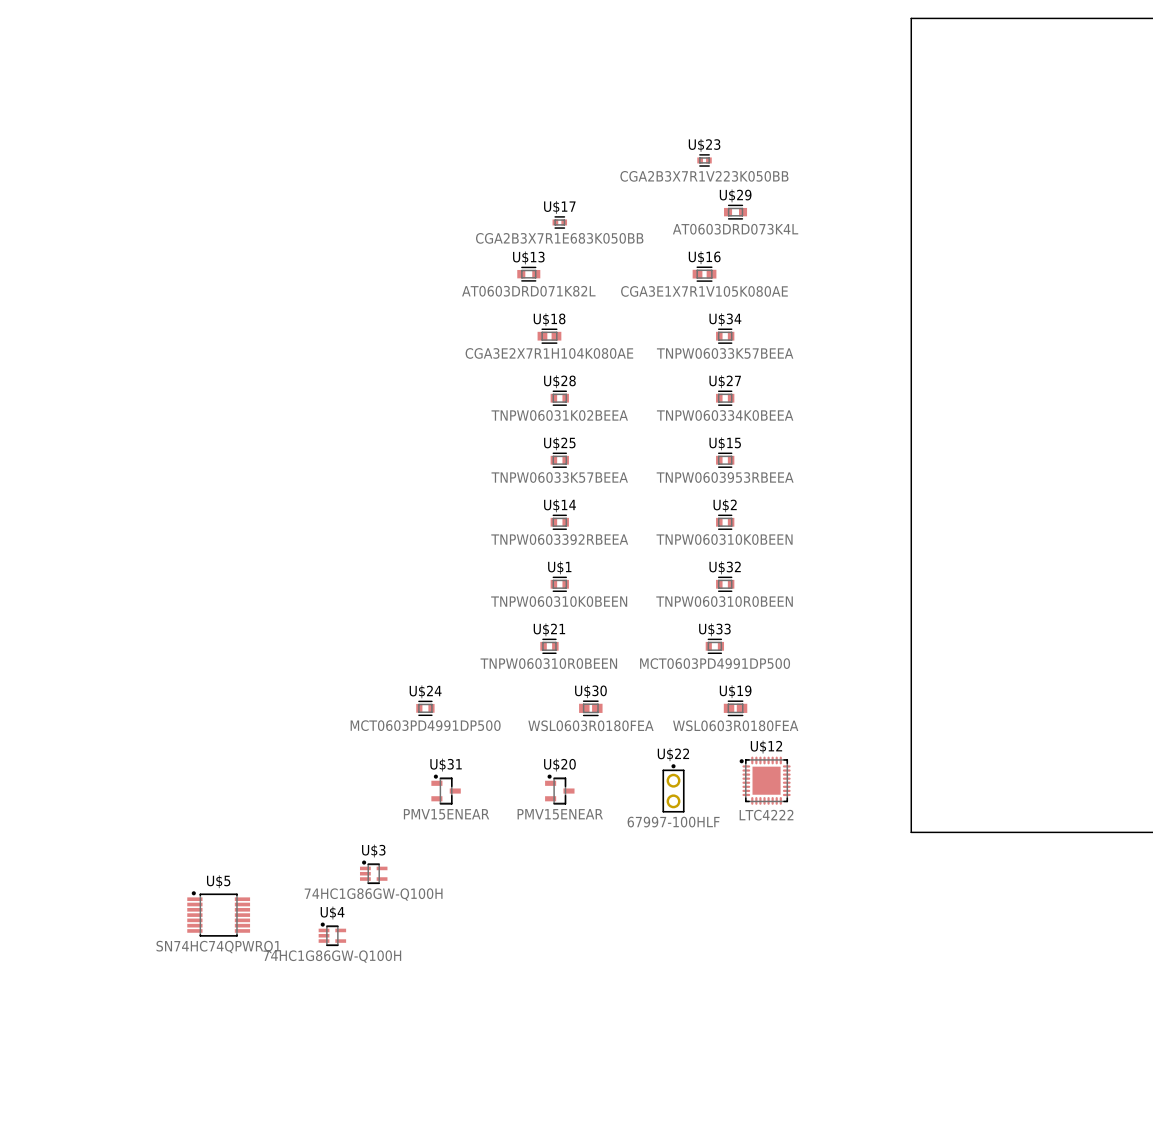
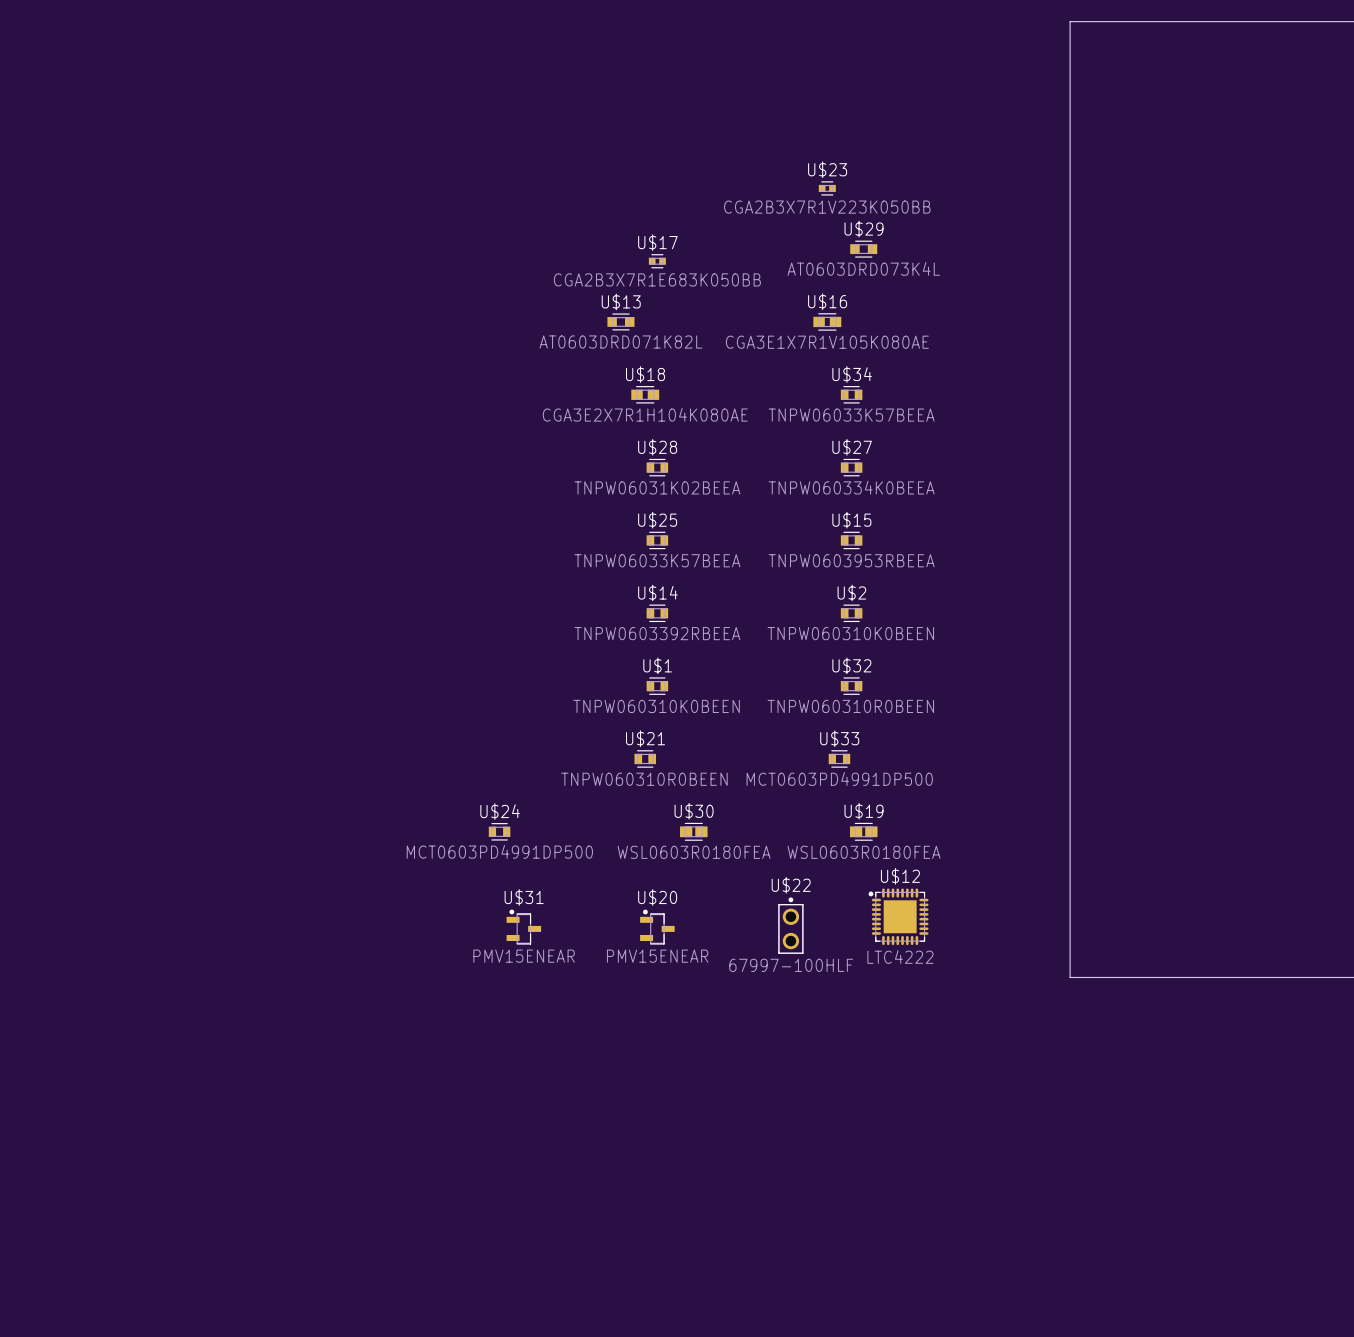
U$3: 74HC1G86GW-Q100H (373, 872) -> none
U$5: SN74HC74QPWRQ1 (218, 913) -> none
U$4: 74HC1G86GW-Q100H (332, 934) -> none

